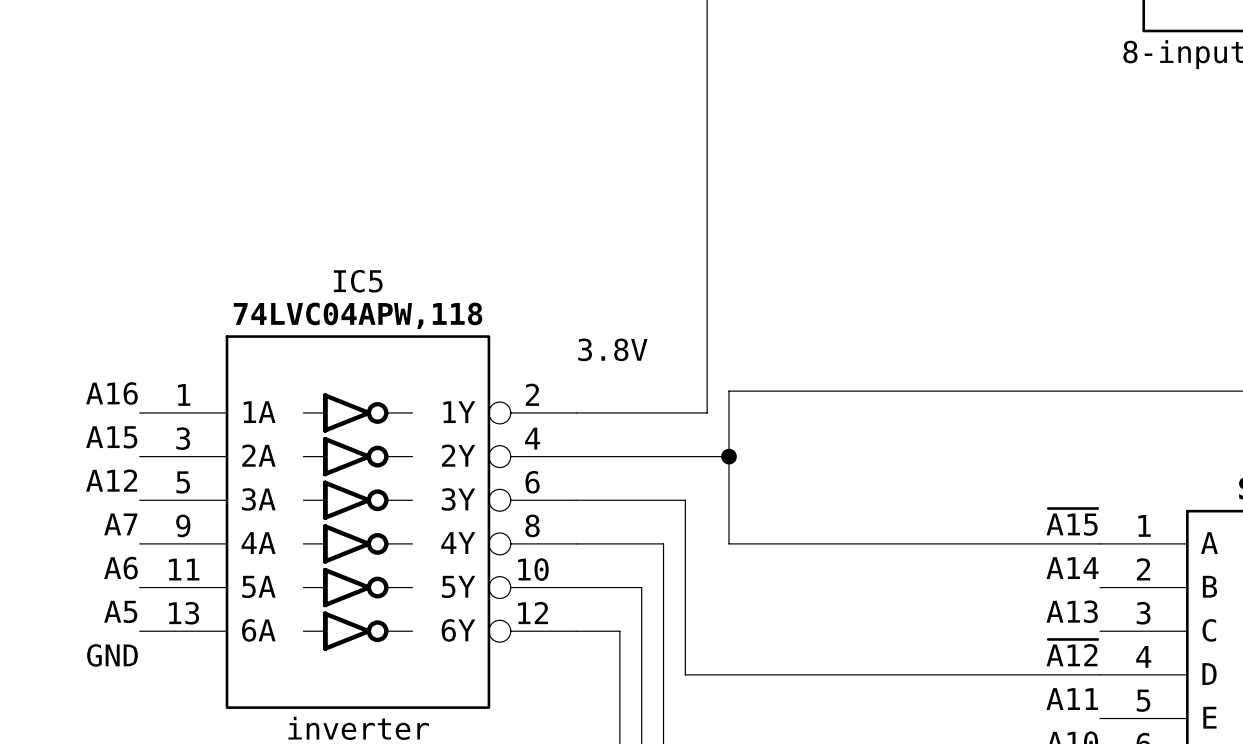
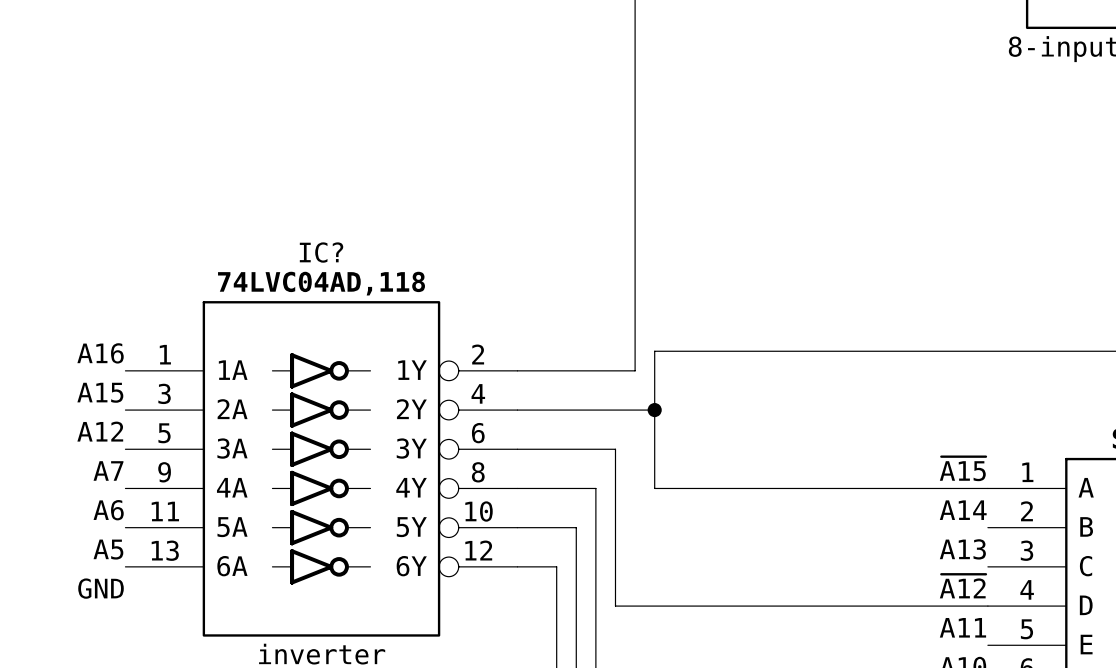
IC5 name: IC5 (358, 281) -> IC? (321, 252)
IC5 value: 74LVC04APW,118 (358, 315) -> 74LVC04AD,118 (321, 283)
label: 3.8V (612, 349) -> none

